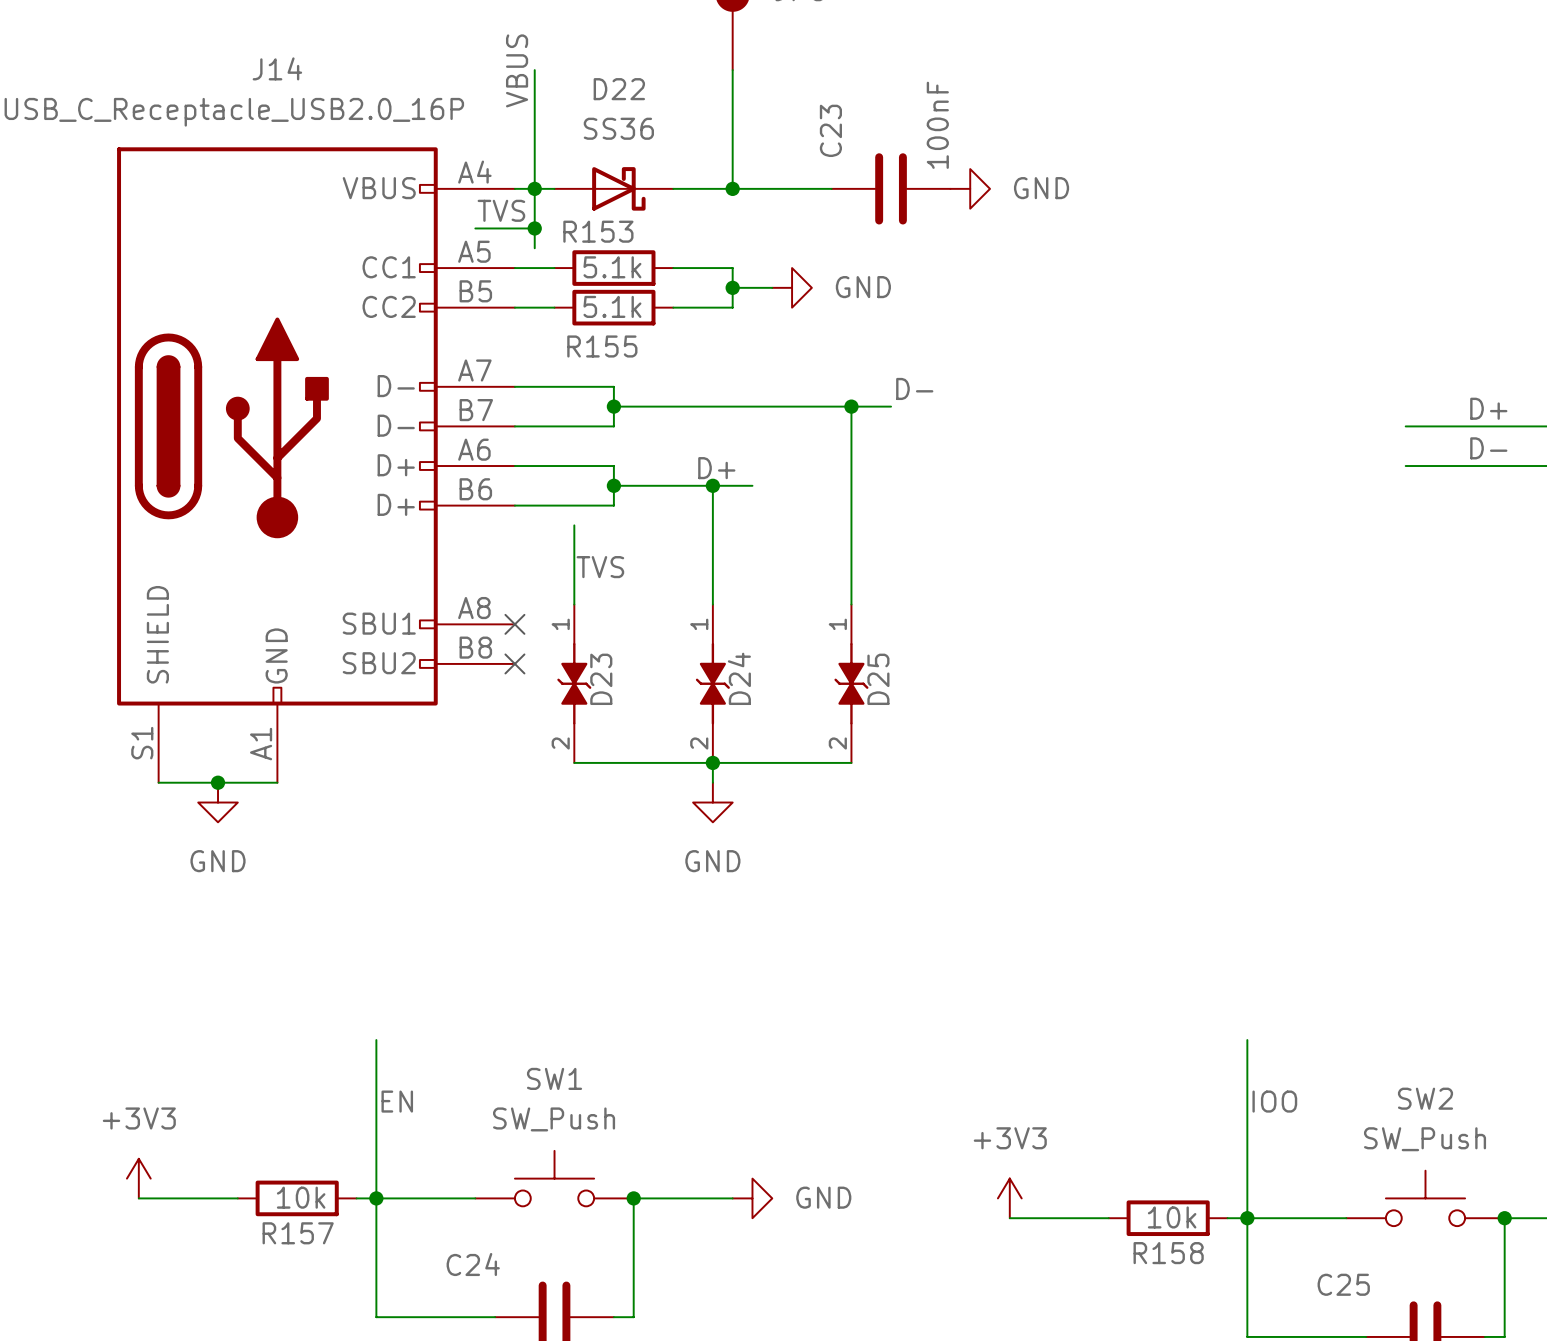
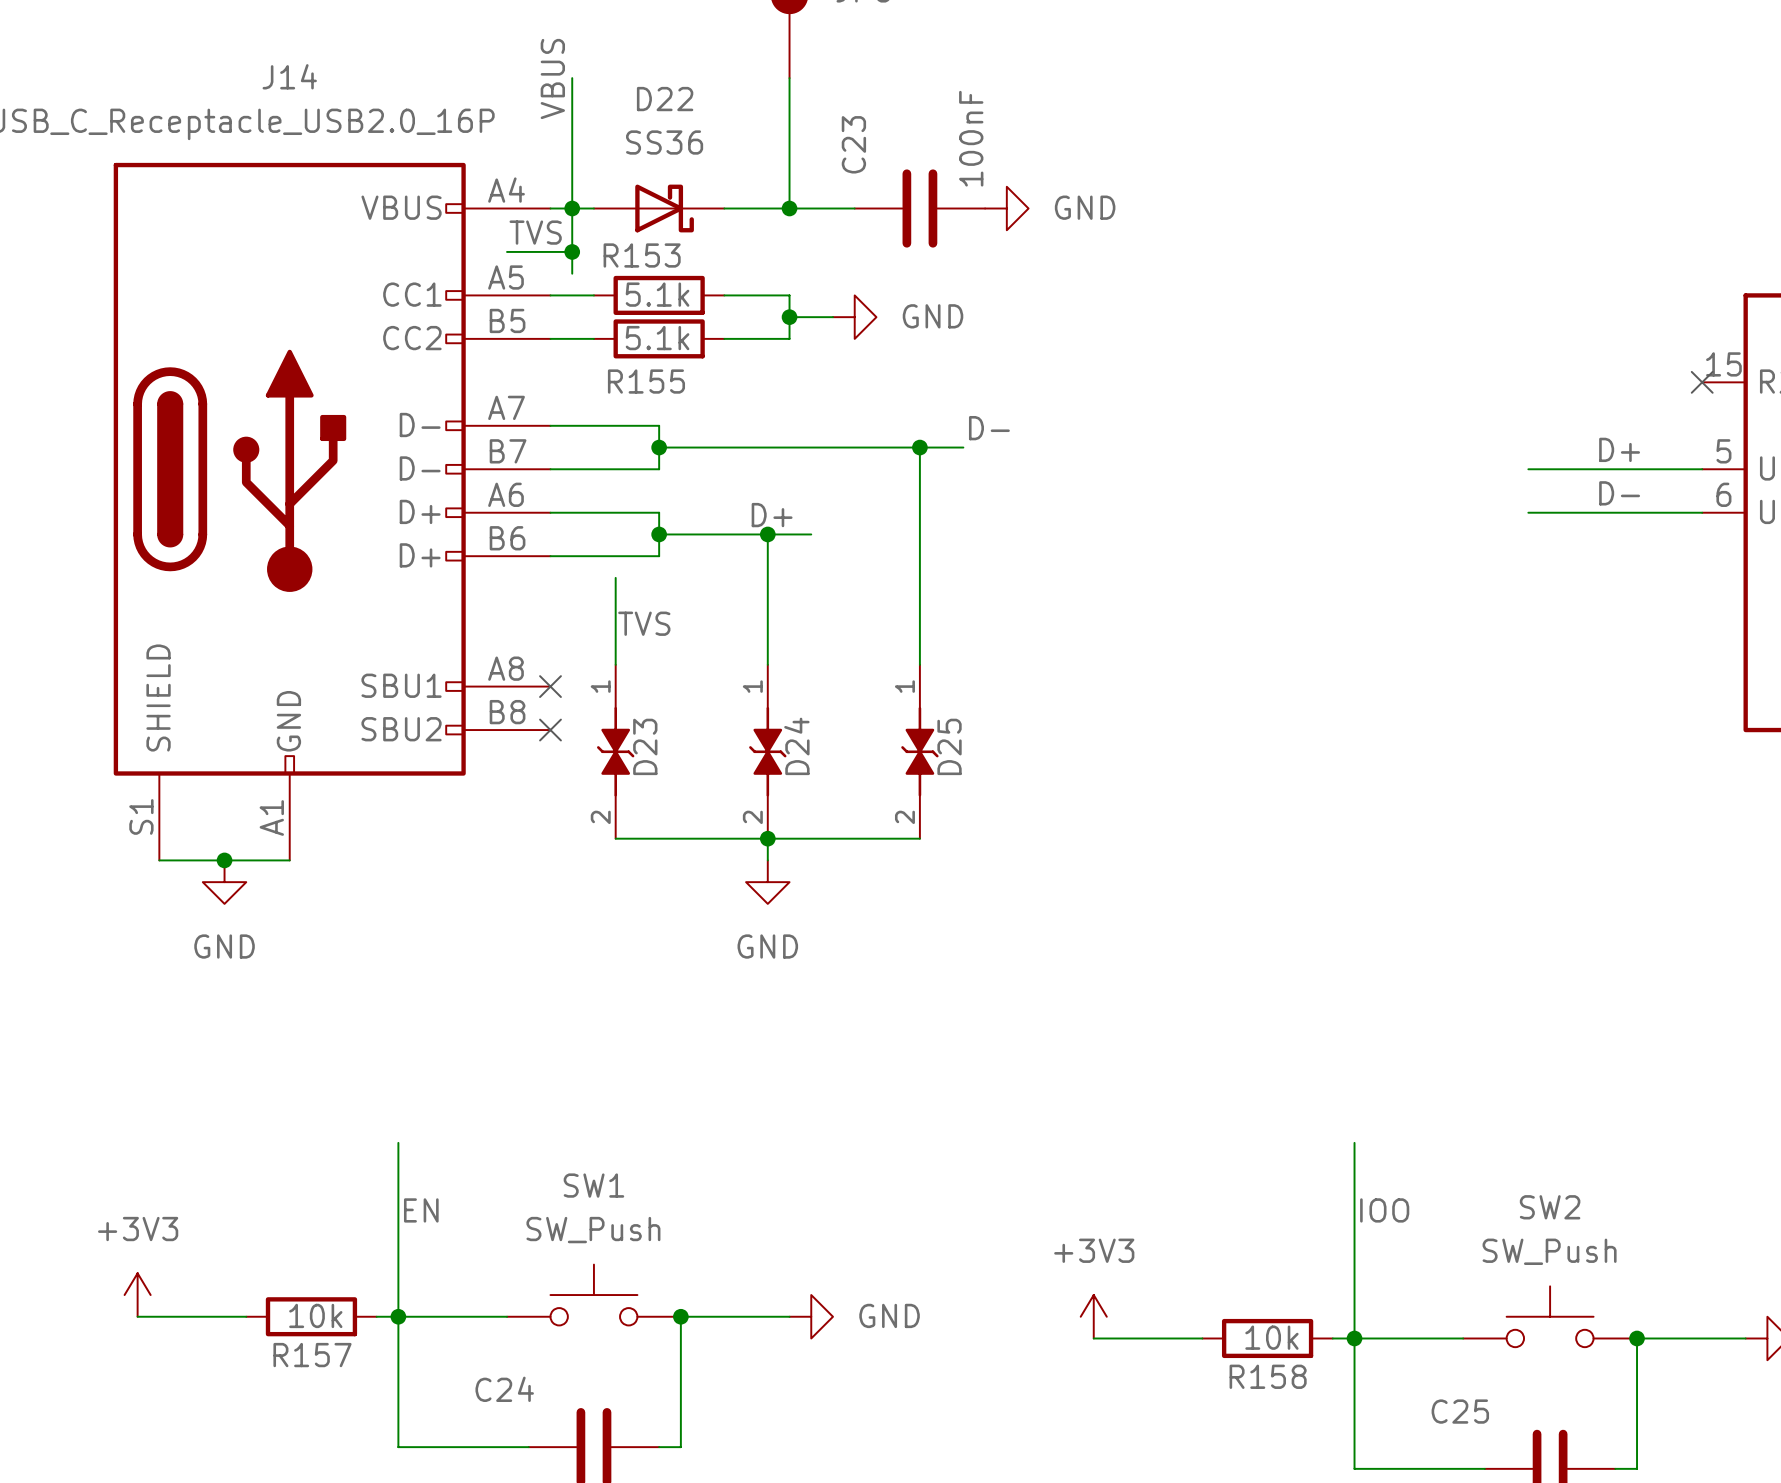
C23 position: (891, 188) -> (919, 208)
power symbol position: GND (970, 188) -> GND (1006, 208)

